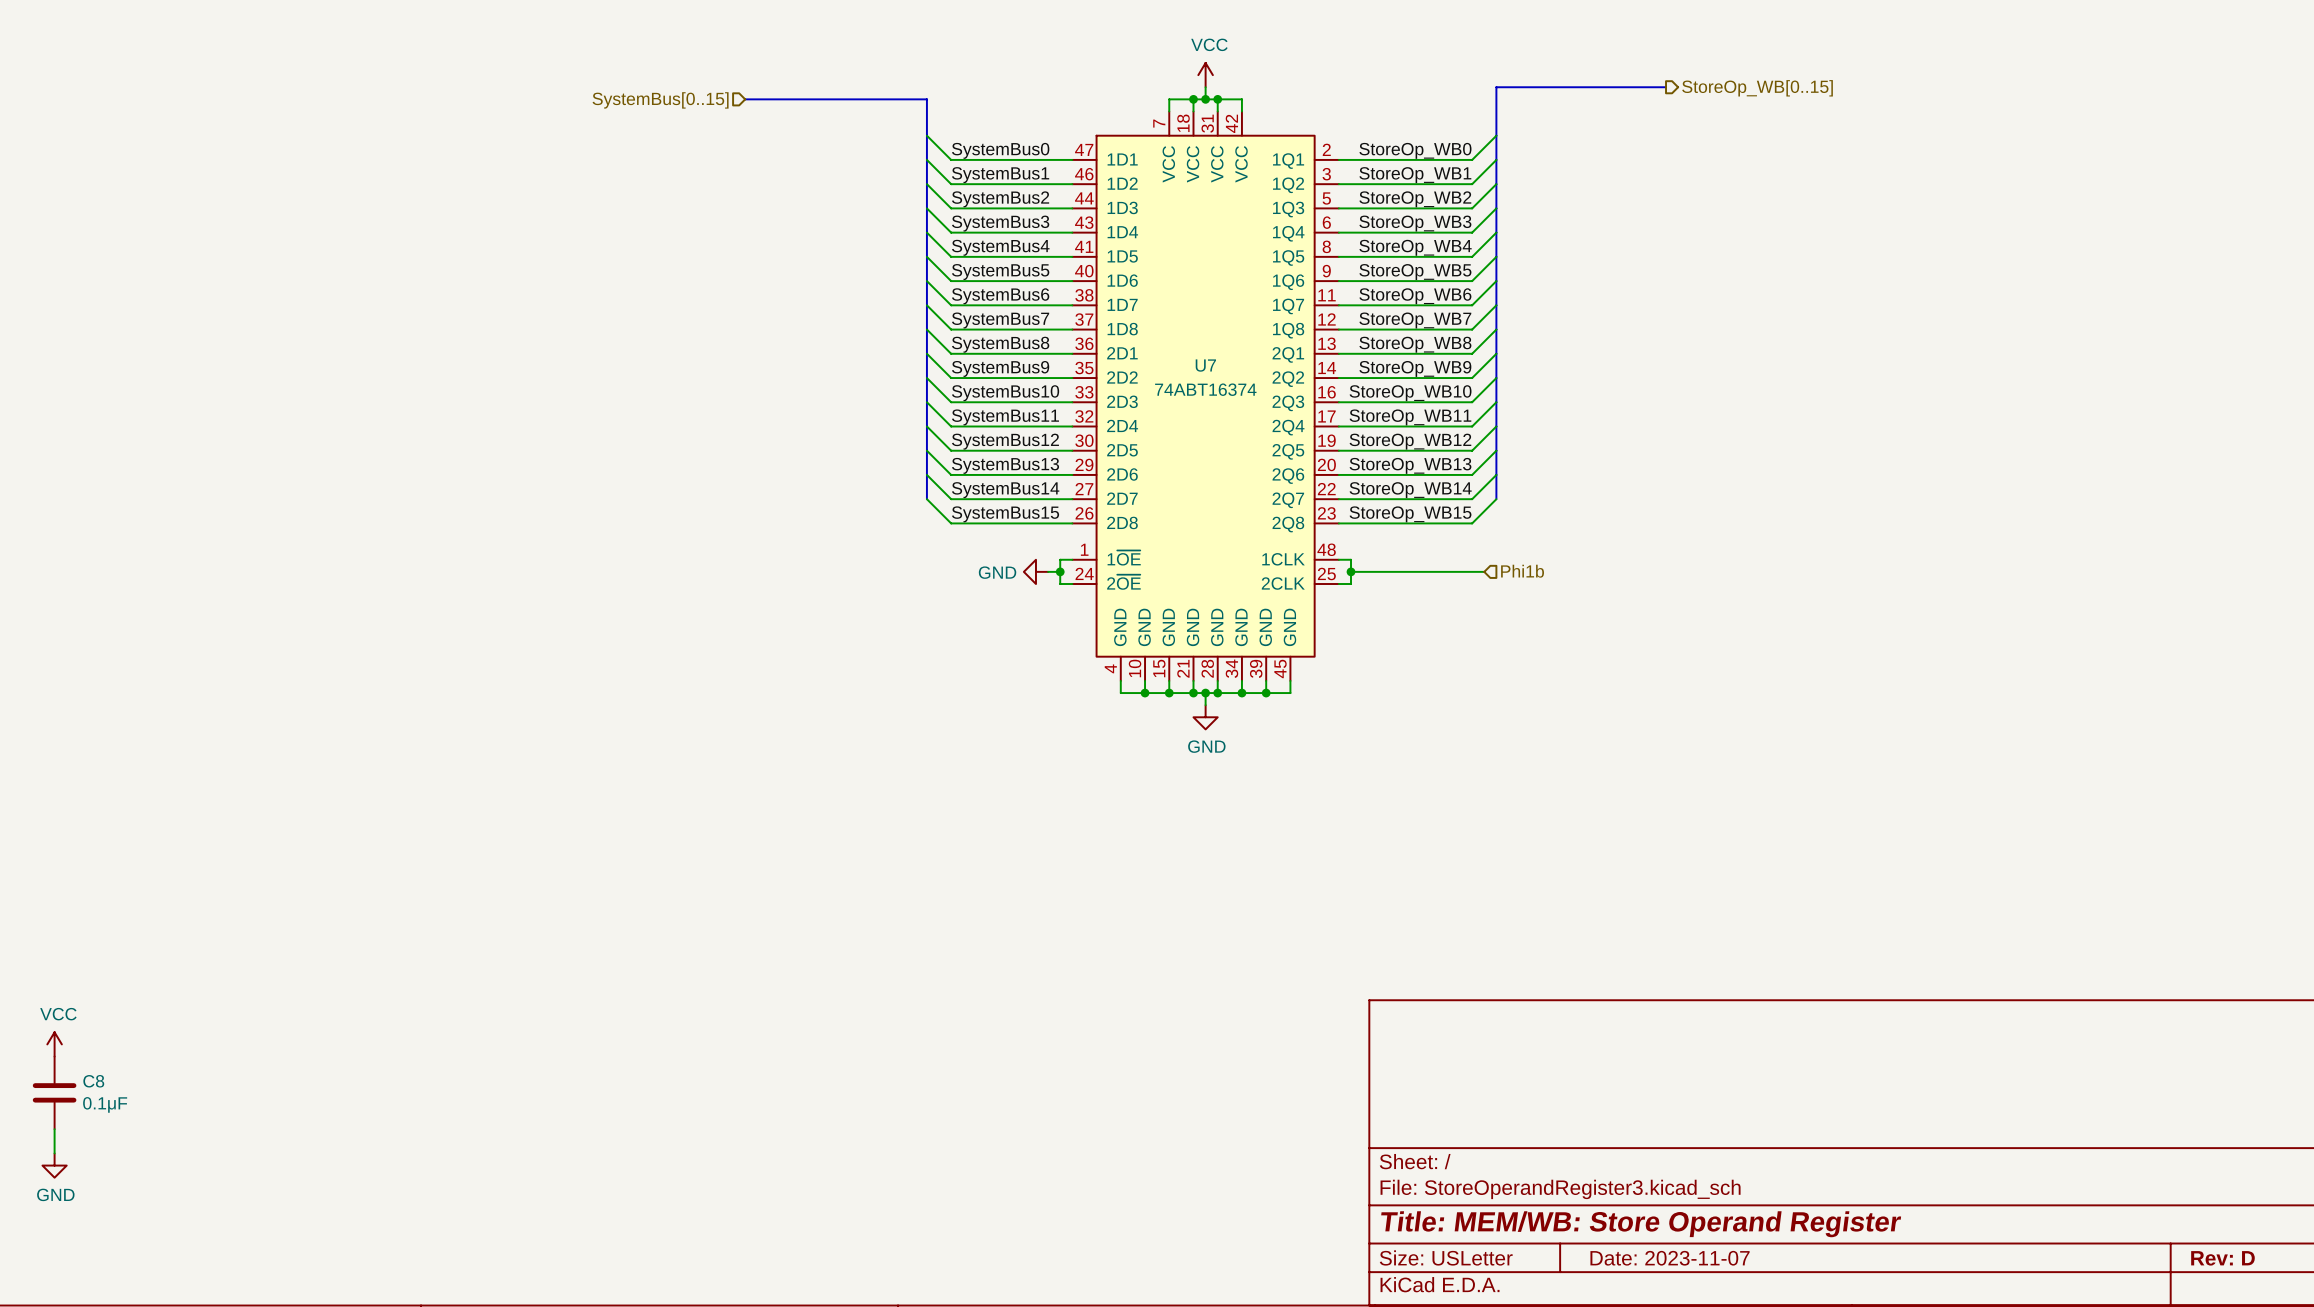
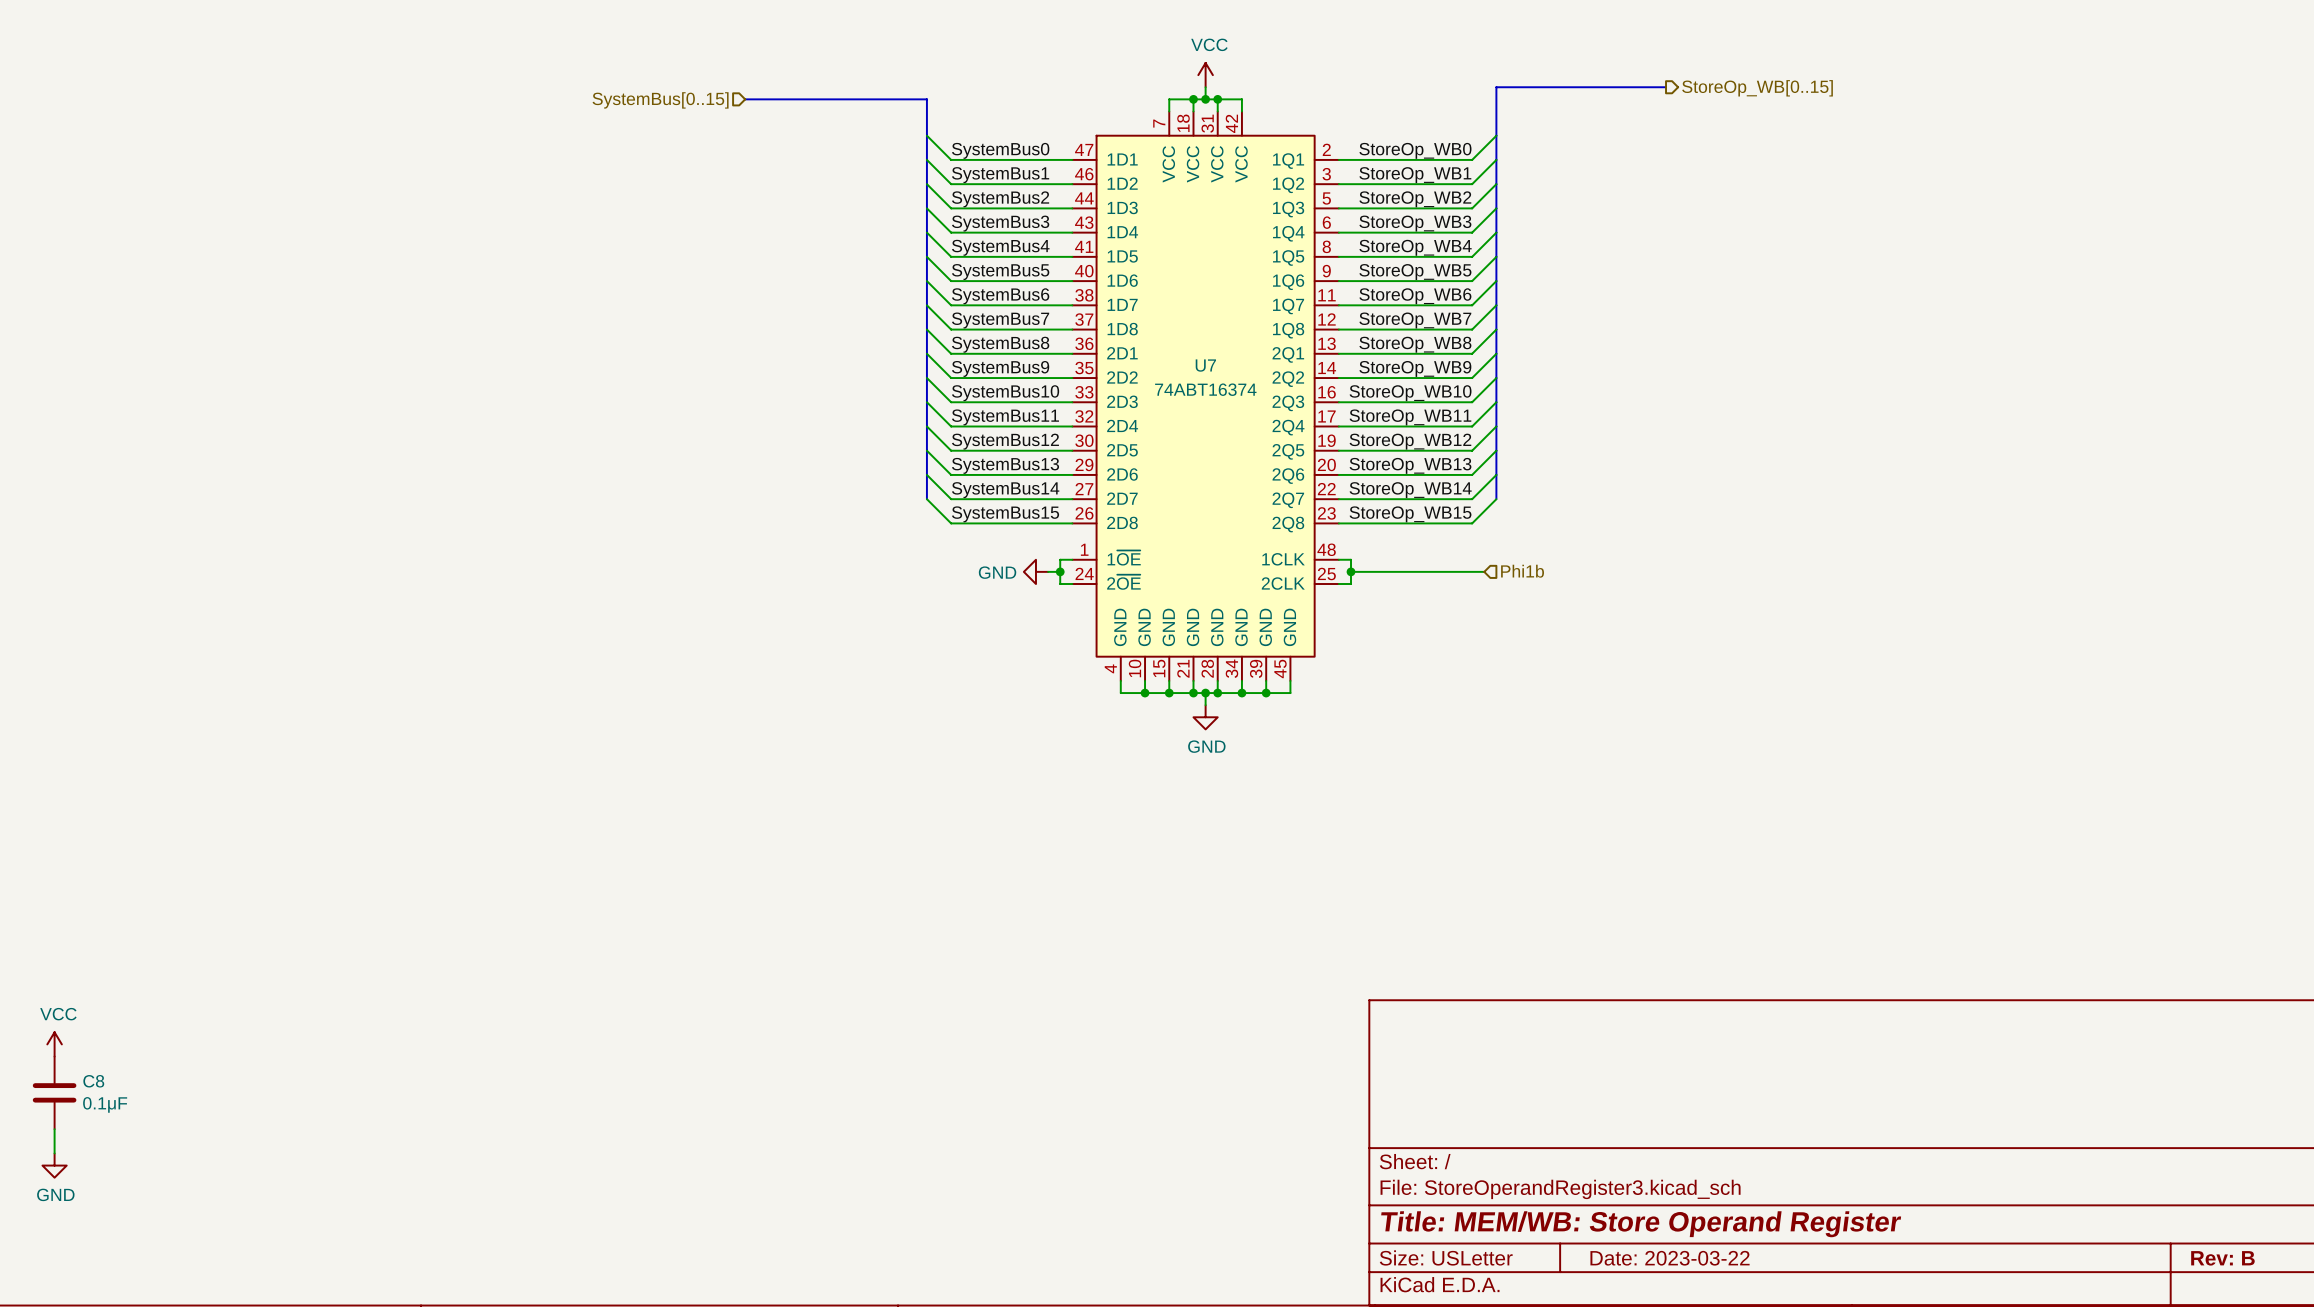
title block: Date: 2023-11-07 (1670, 1258) -> Date: 2023-03-22 (1670, 1258)
title block: Rev: D (2222, 1258) -> Rev: B (2222, 1258)

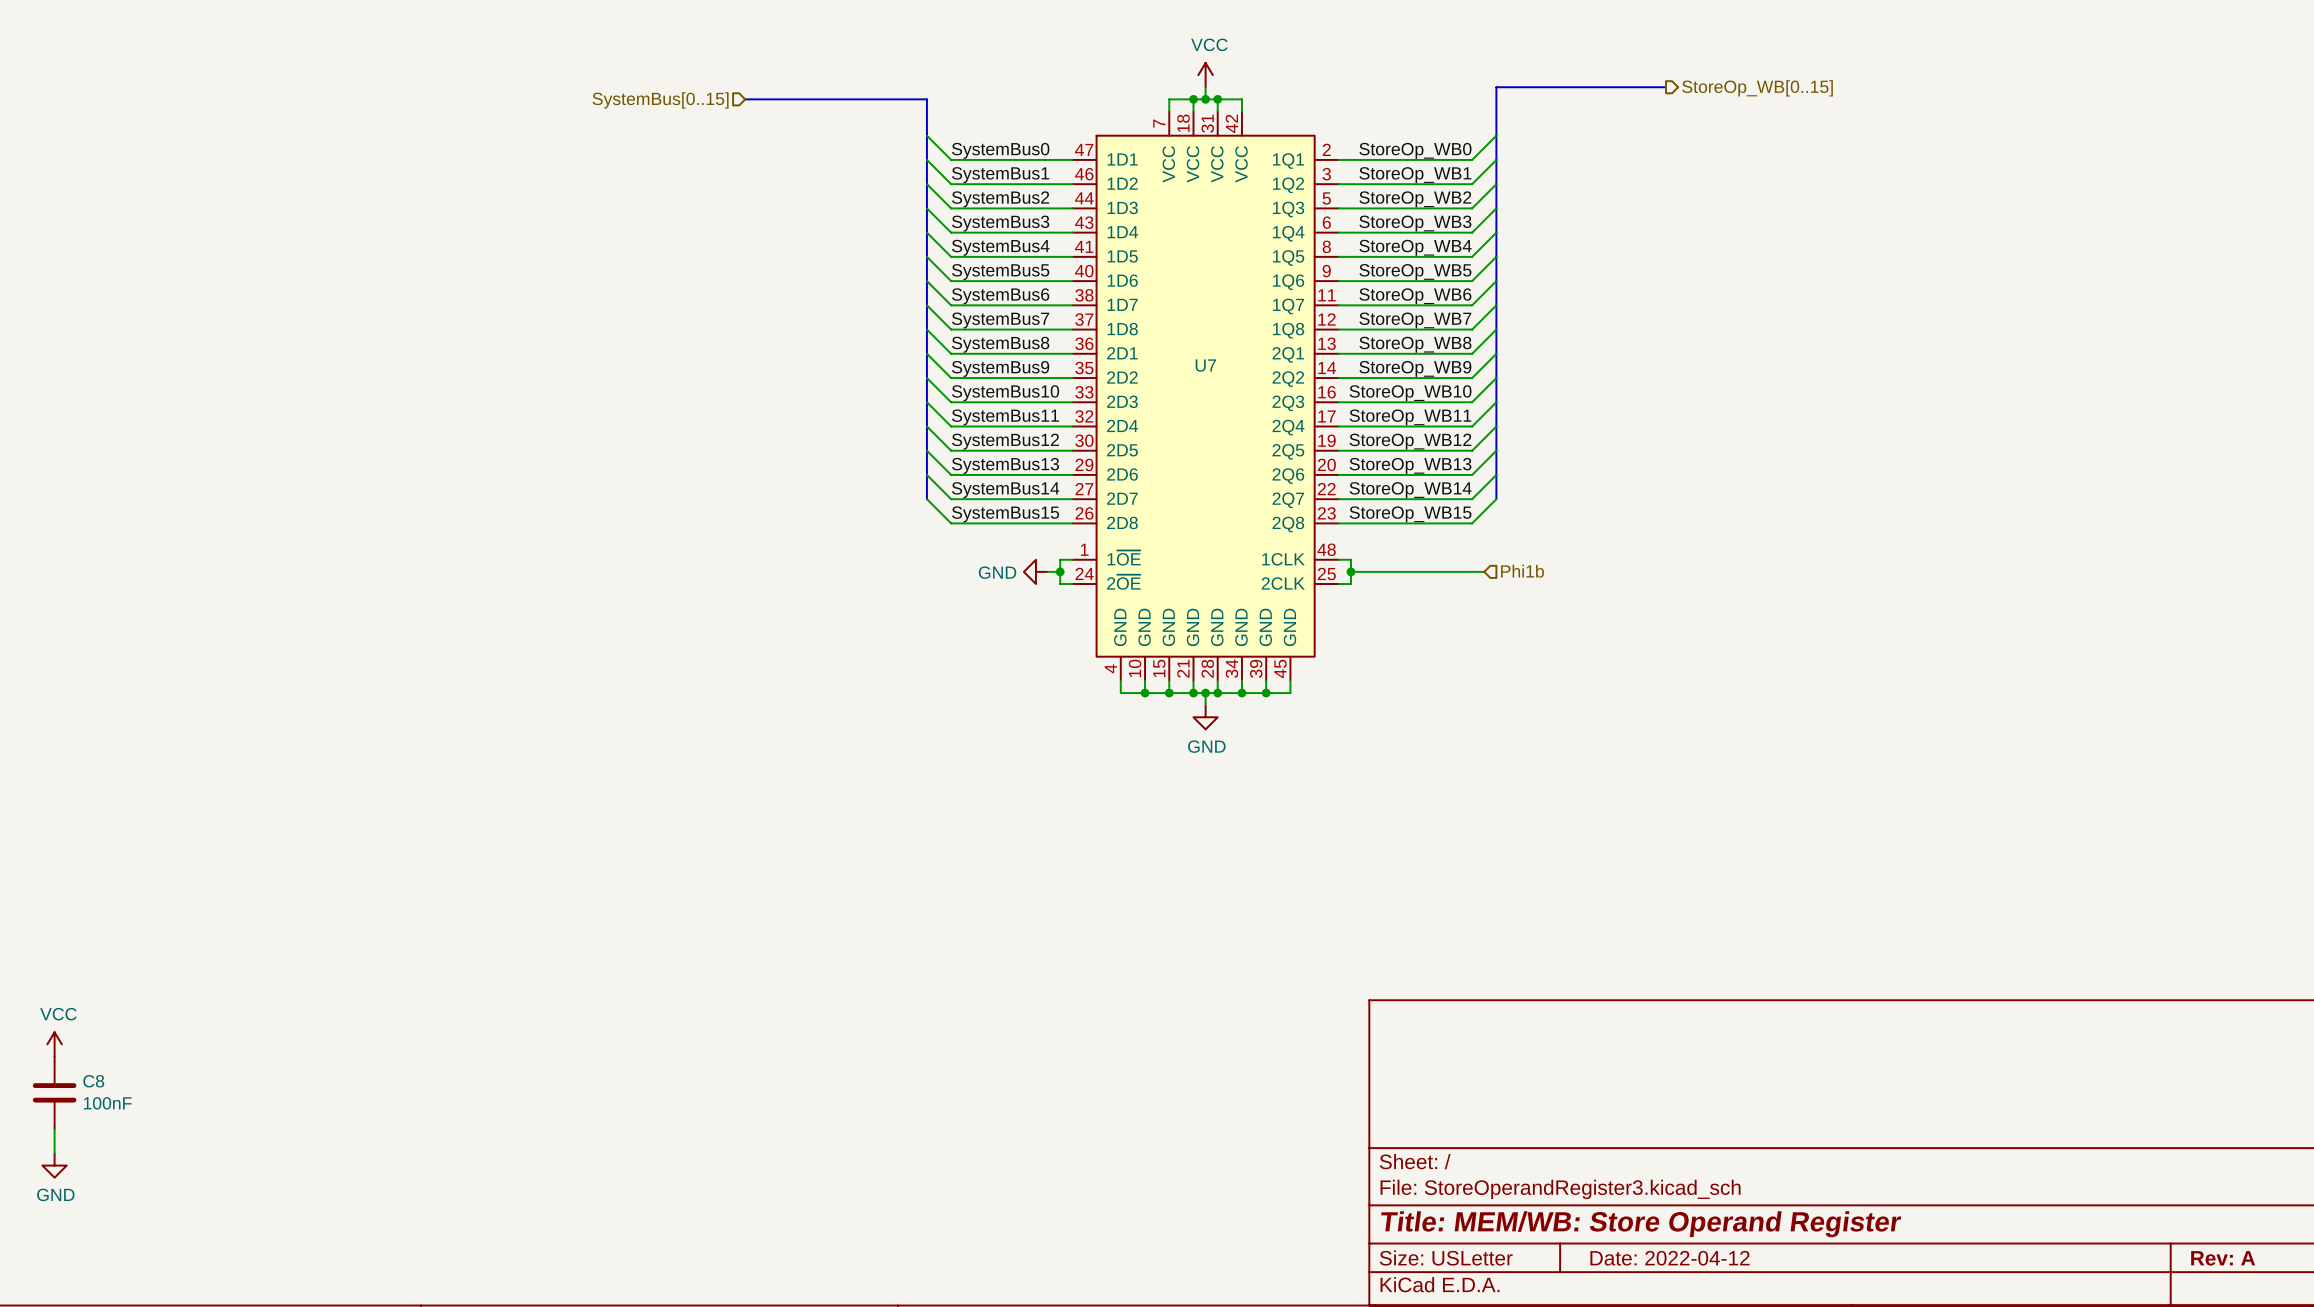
U7 value: 74ABT16374 (1205, 389) -> none
C8 value: 0.1μF (105, 1104) -> 100nF (107, 1103)
title block: Date: 2023-03-22 (1670, 1258) -> Date: 2022-04-12 (1670, 1258)
title block: Rev: B (2222, 1258) -> Rev: A (2223, 1258)

